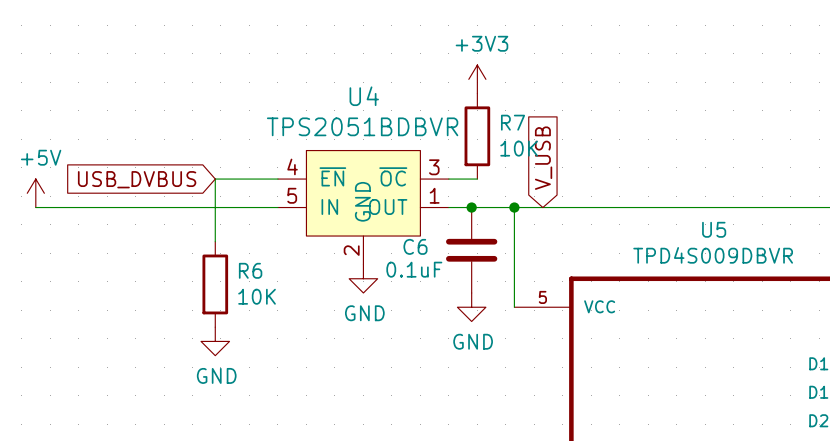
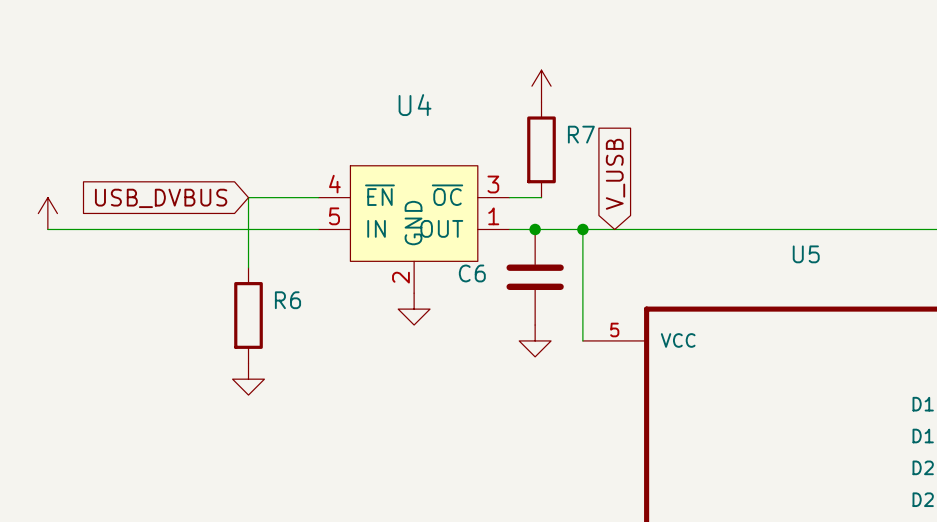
power symbol text: +3V3 (481, 43) -> none
U4 value: TPS2051BDBVR (362, 126) -> none
R7 value: 10K (519, 148) -> none
power symbol text: +5V (41, 157) -> none
U5 value: TPD4S009DBVR (713, 255) -> none
C6 value: 0.1uF (414, 269) -> none
R6 value: 10K (257, 296) -> none
power symbol text: GND (364, 313) -> none
power symbol text: GND (473, 341) -> none
power symbol text: GND (216, 375) -> none

